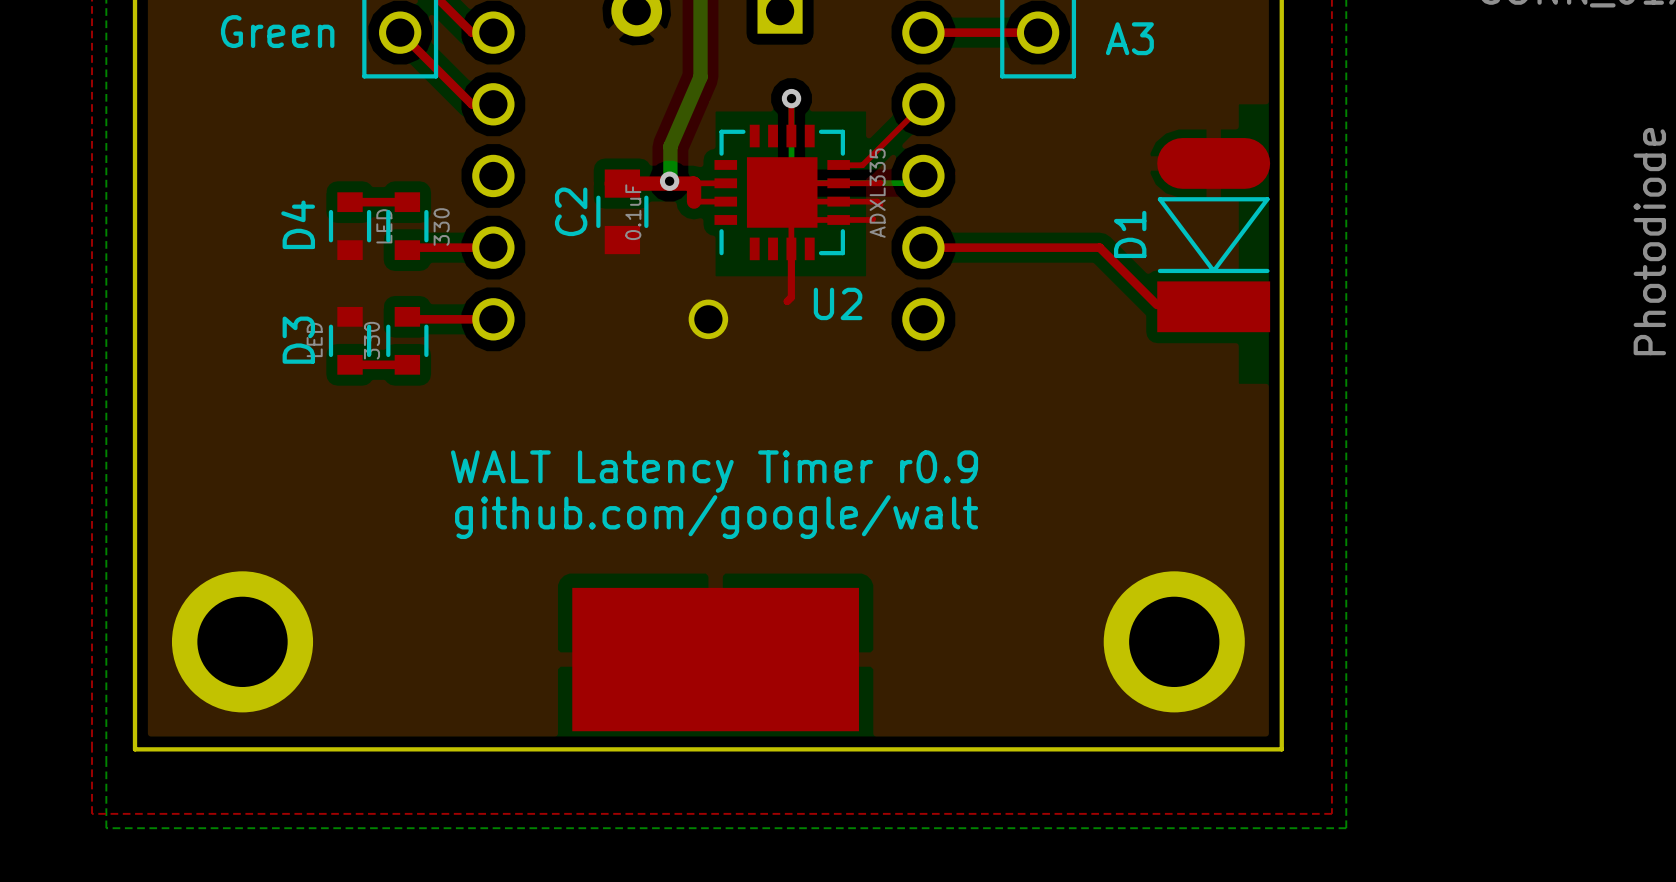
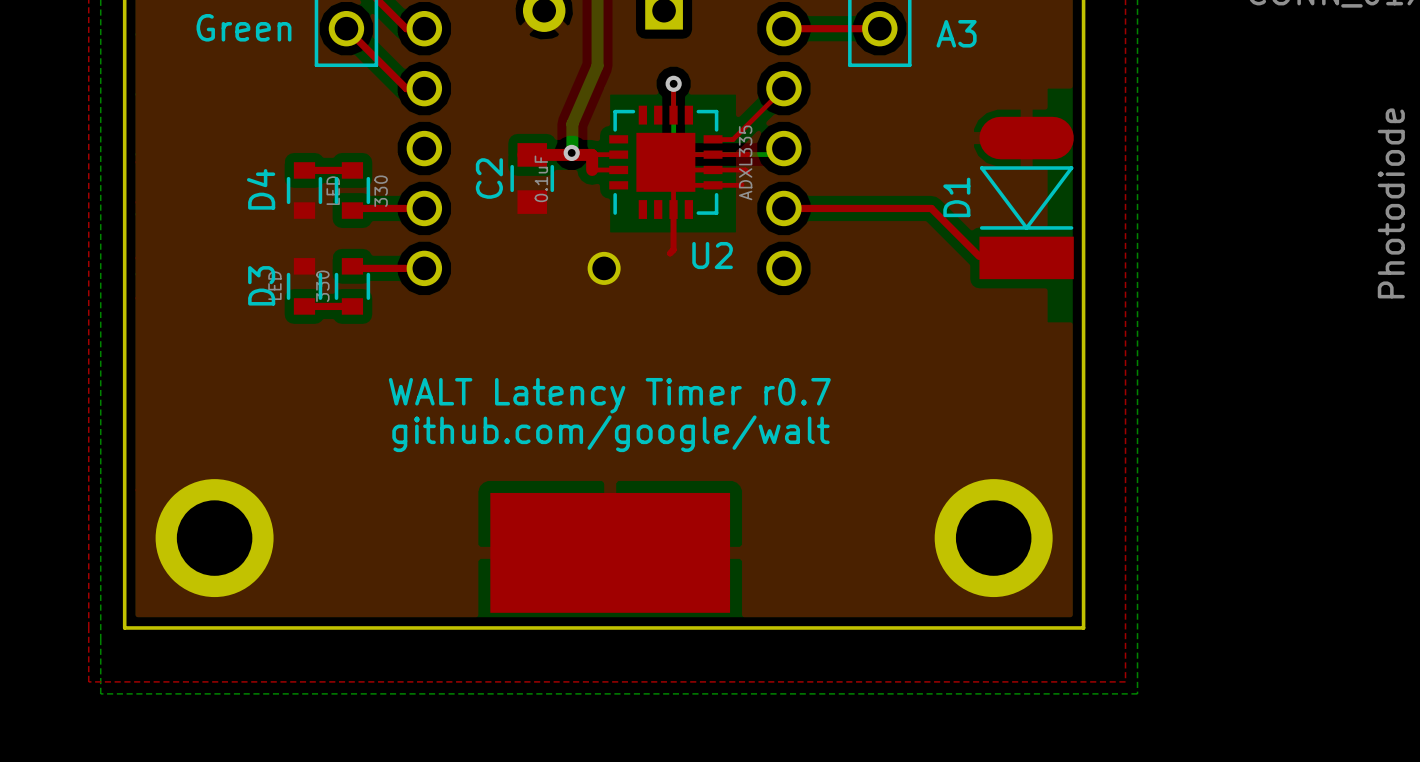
text: WALT Latency Timer r0.9 (714, 471) -> WALT Latency Timer r0.7 (609, 395)

